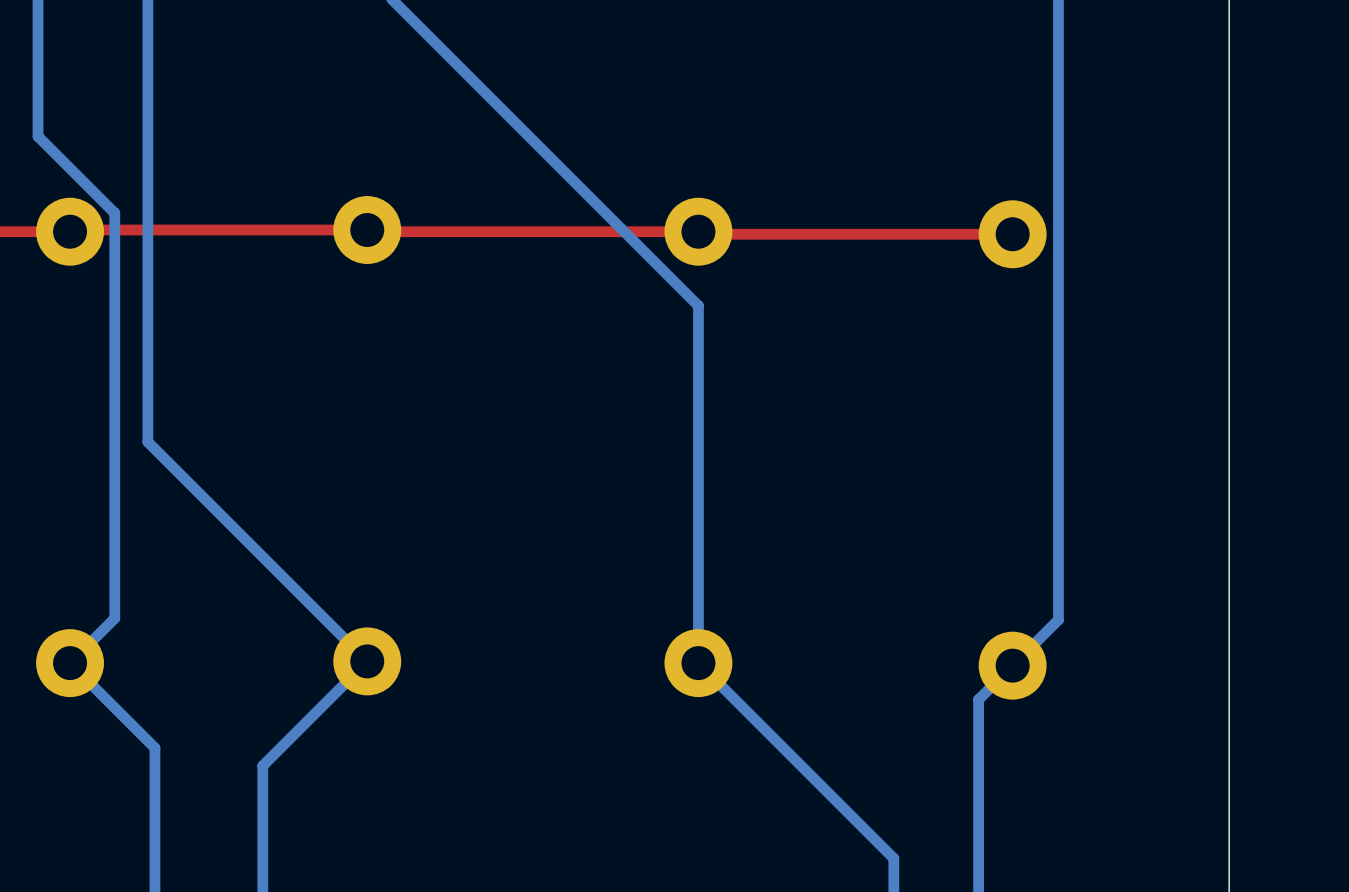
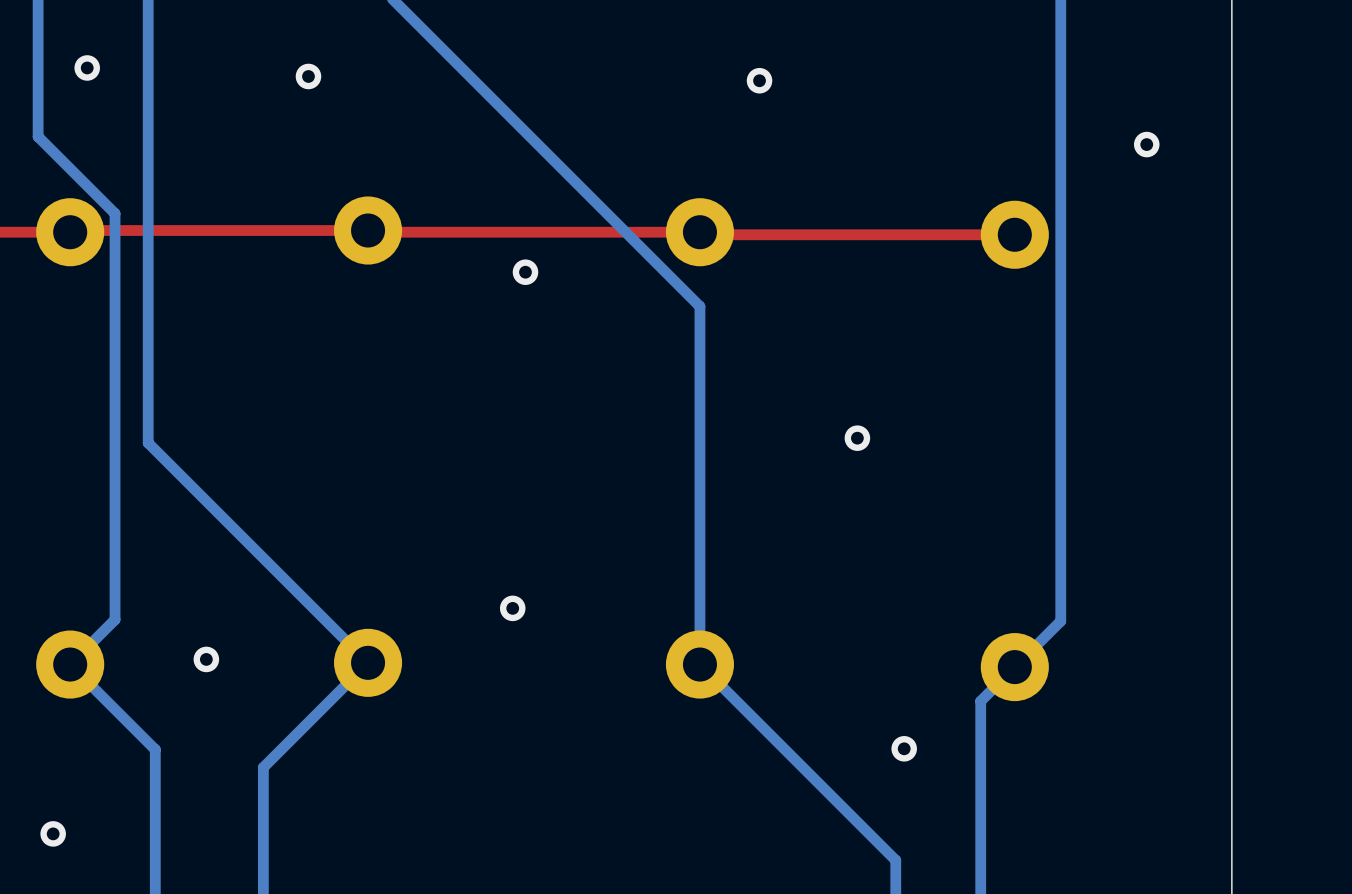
via: none -> (87, 67)
via: none -> (308, 76)
via: none -> (759, 80)
via: none -> (1146, 144)
via: none -> (525, 272)
via: none -> (857, 438)
via: none -> (512, 608)
via: none -> (206, 659)
via: none -> (904, 748)
via: none -> (53, 833)

